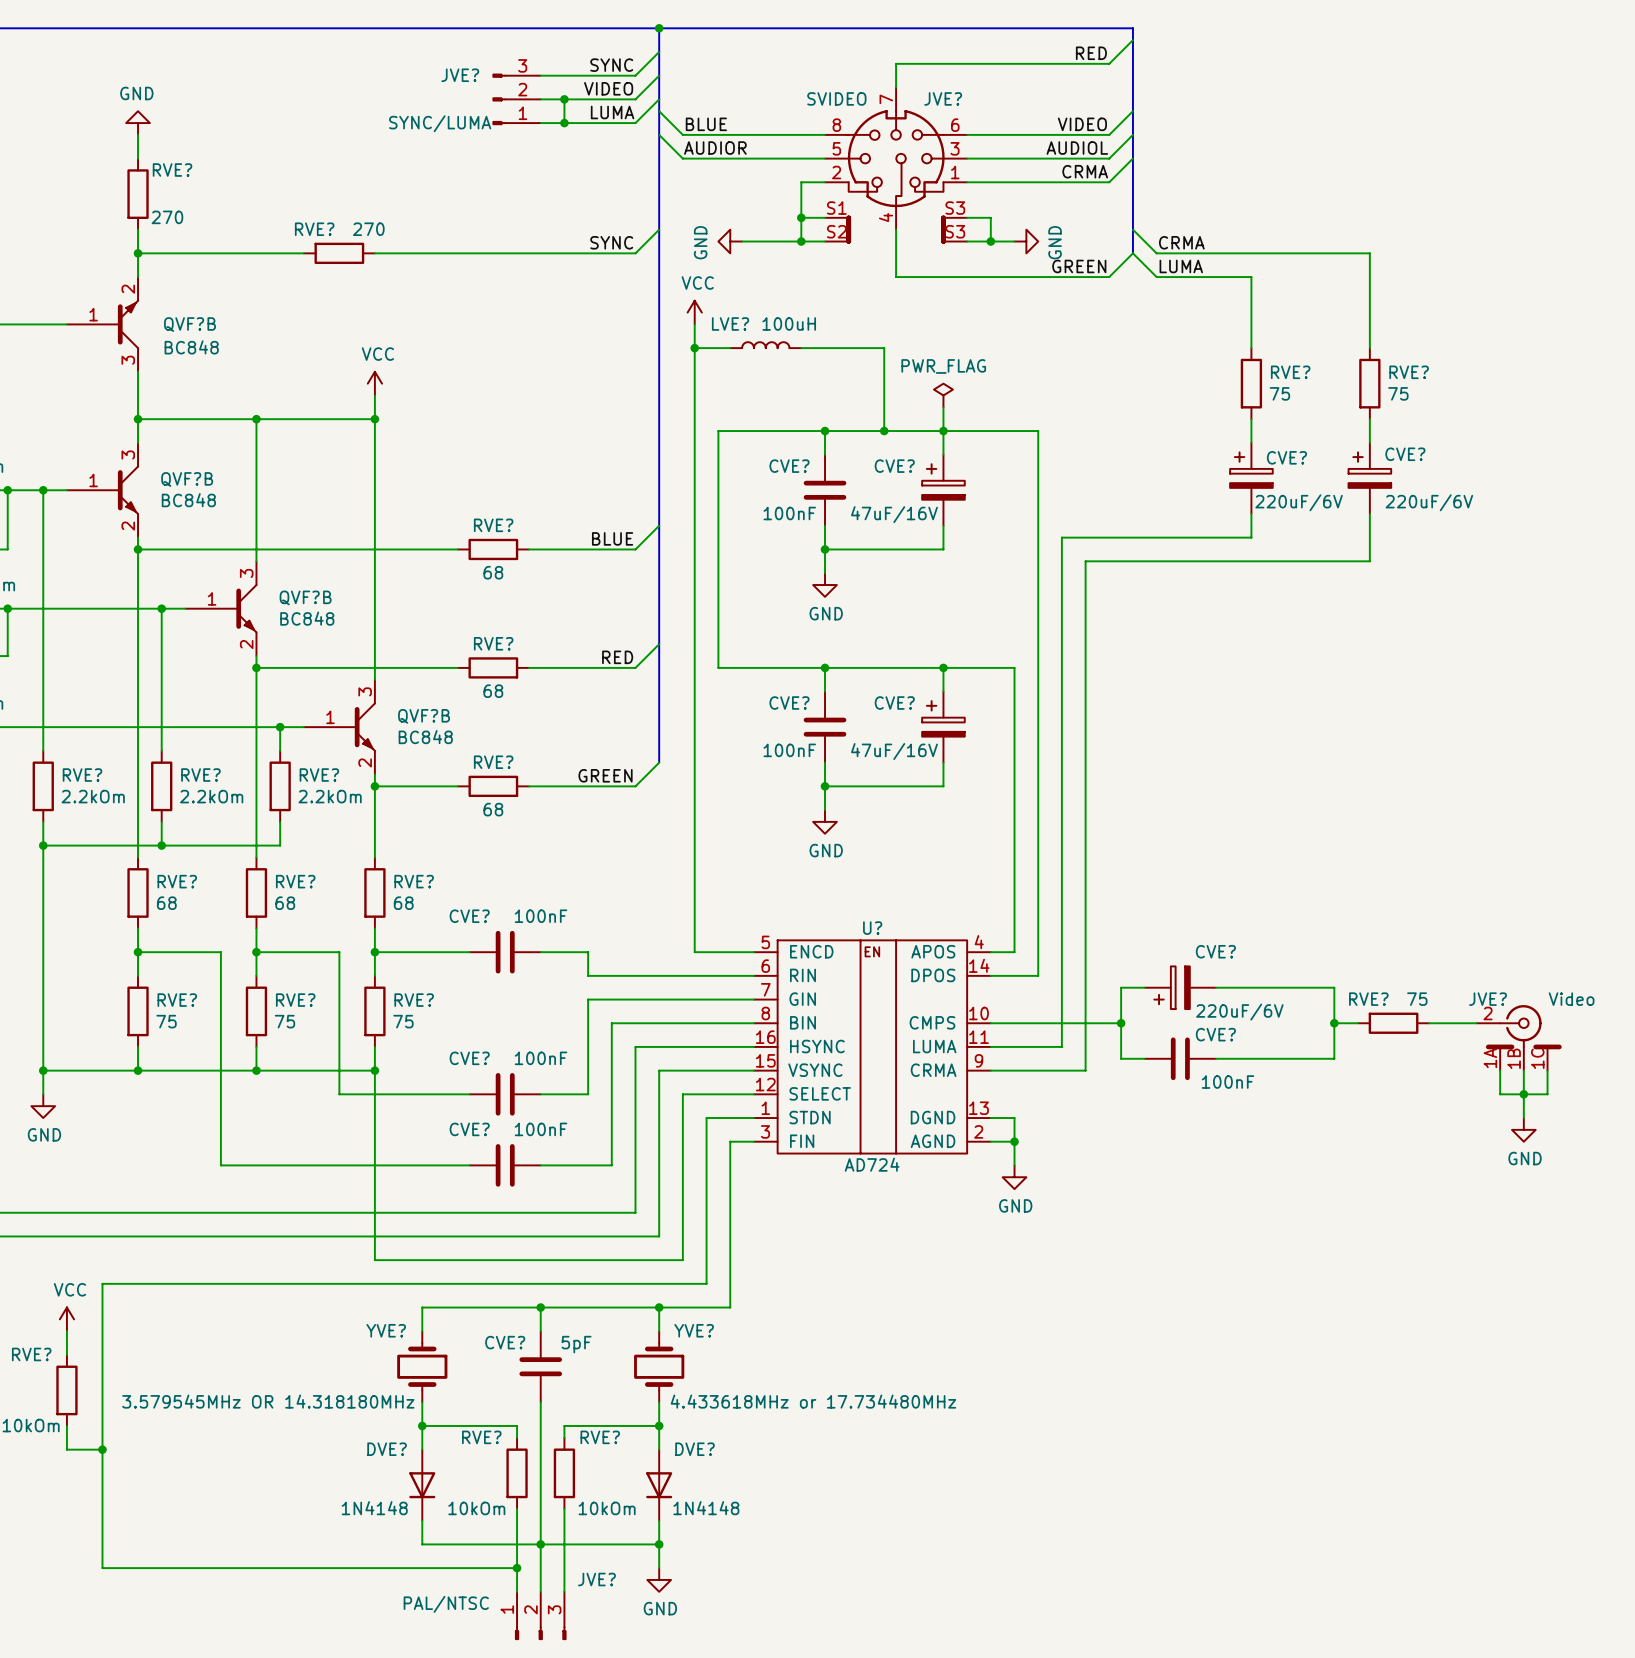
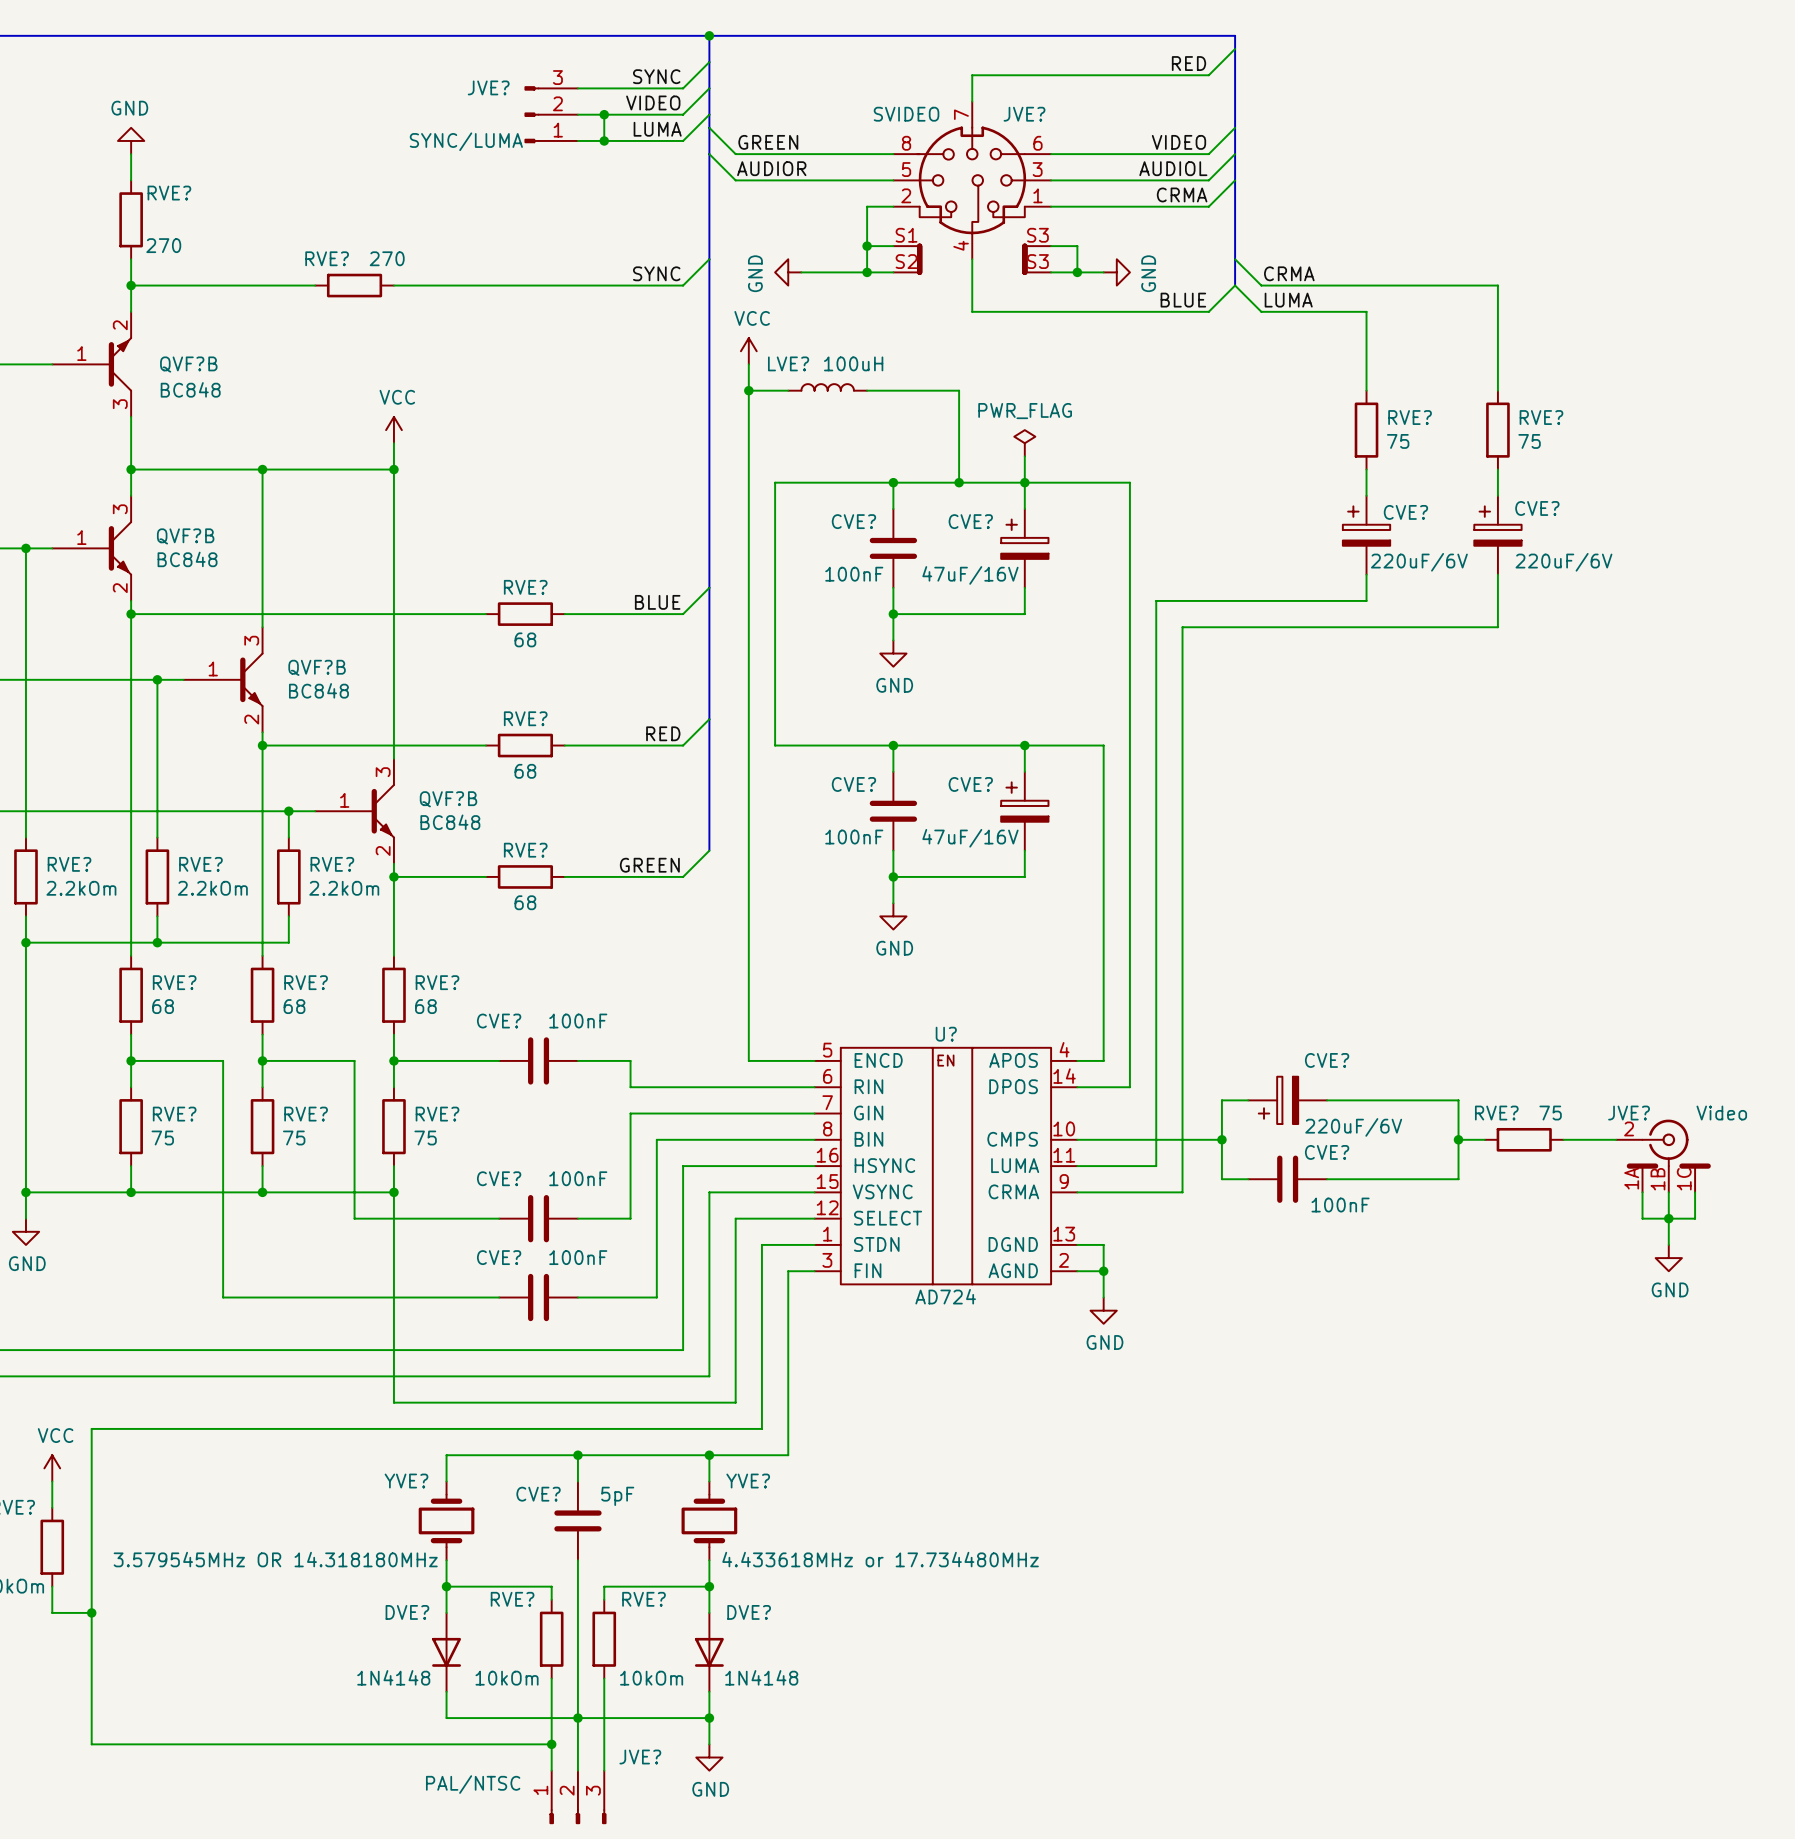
label: BLUE (706, 124) -> GREEN (768, 142)
label: GREEN (1079, 266) -> BLUE (1183, 300)

